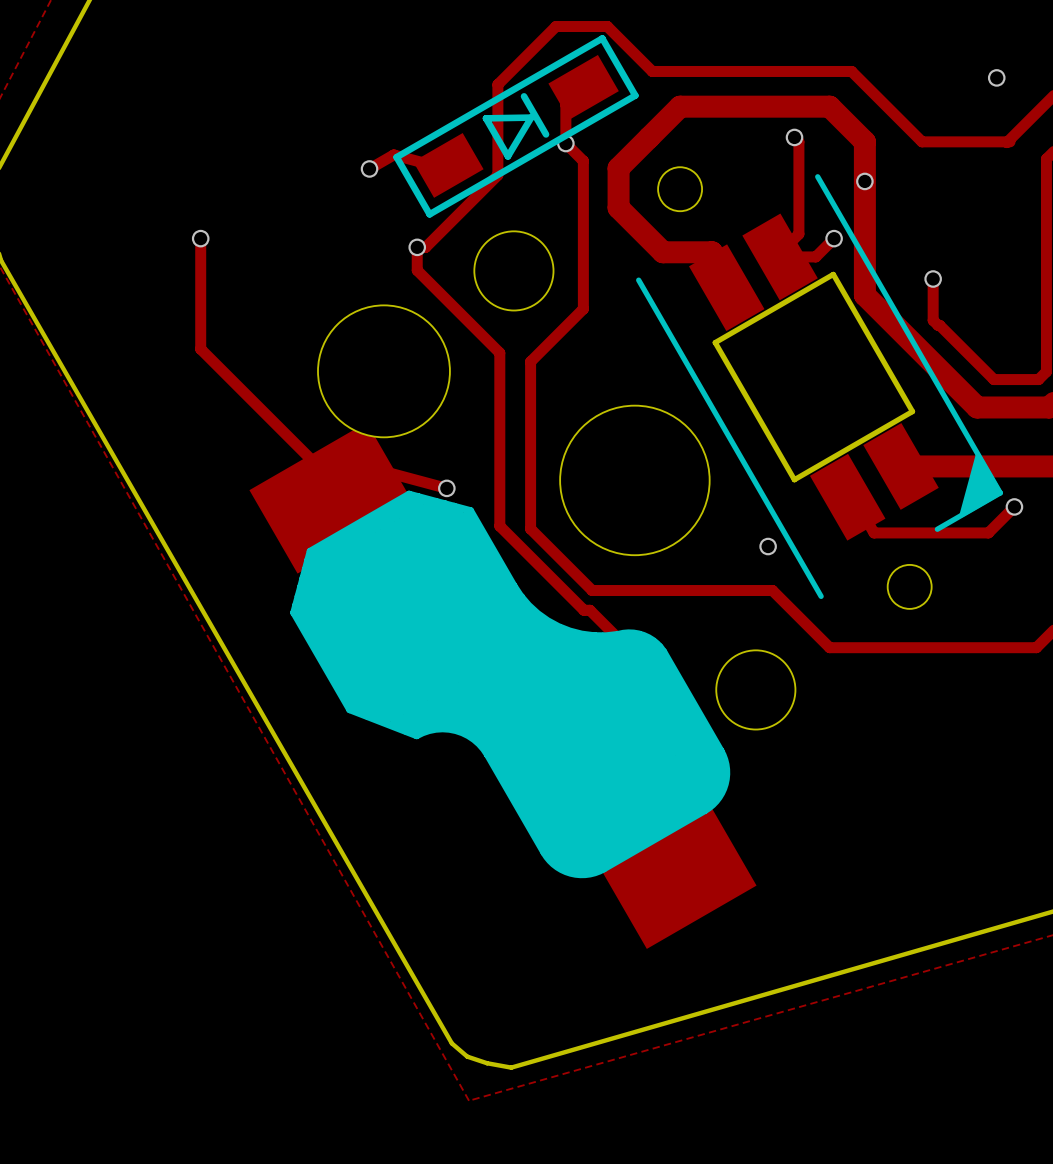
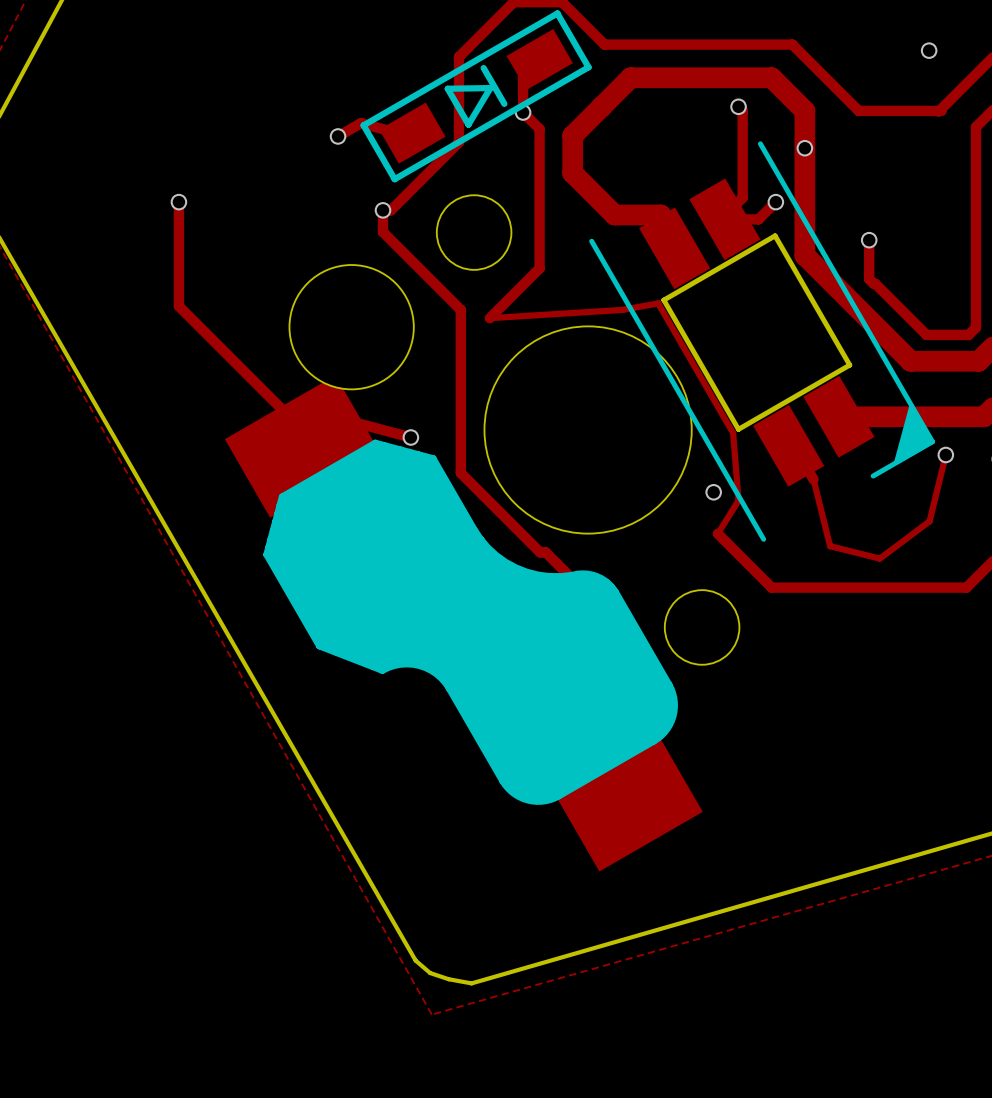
part footprint: [249, 167, 1003, 949] -> [224, 107, 935, 872]
track: (530, 361) (530, 528) (592, 590) (772, 590) -> (489, 318) (622, 309) (658, 303) (733, 433) (738, 500) (717, 533)
track: (1014, 506) (988, 532) (874, 532) -> (945, 454) (929, 521) (879, 558) (830, 546) (813, 479)

